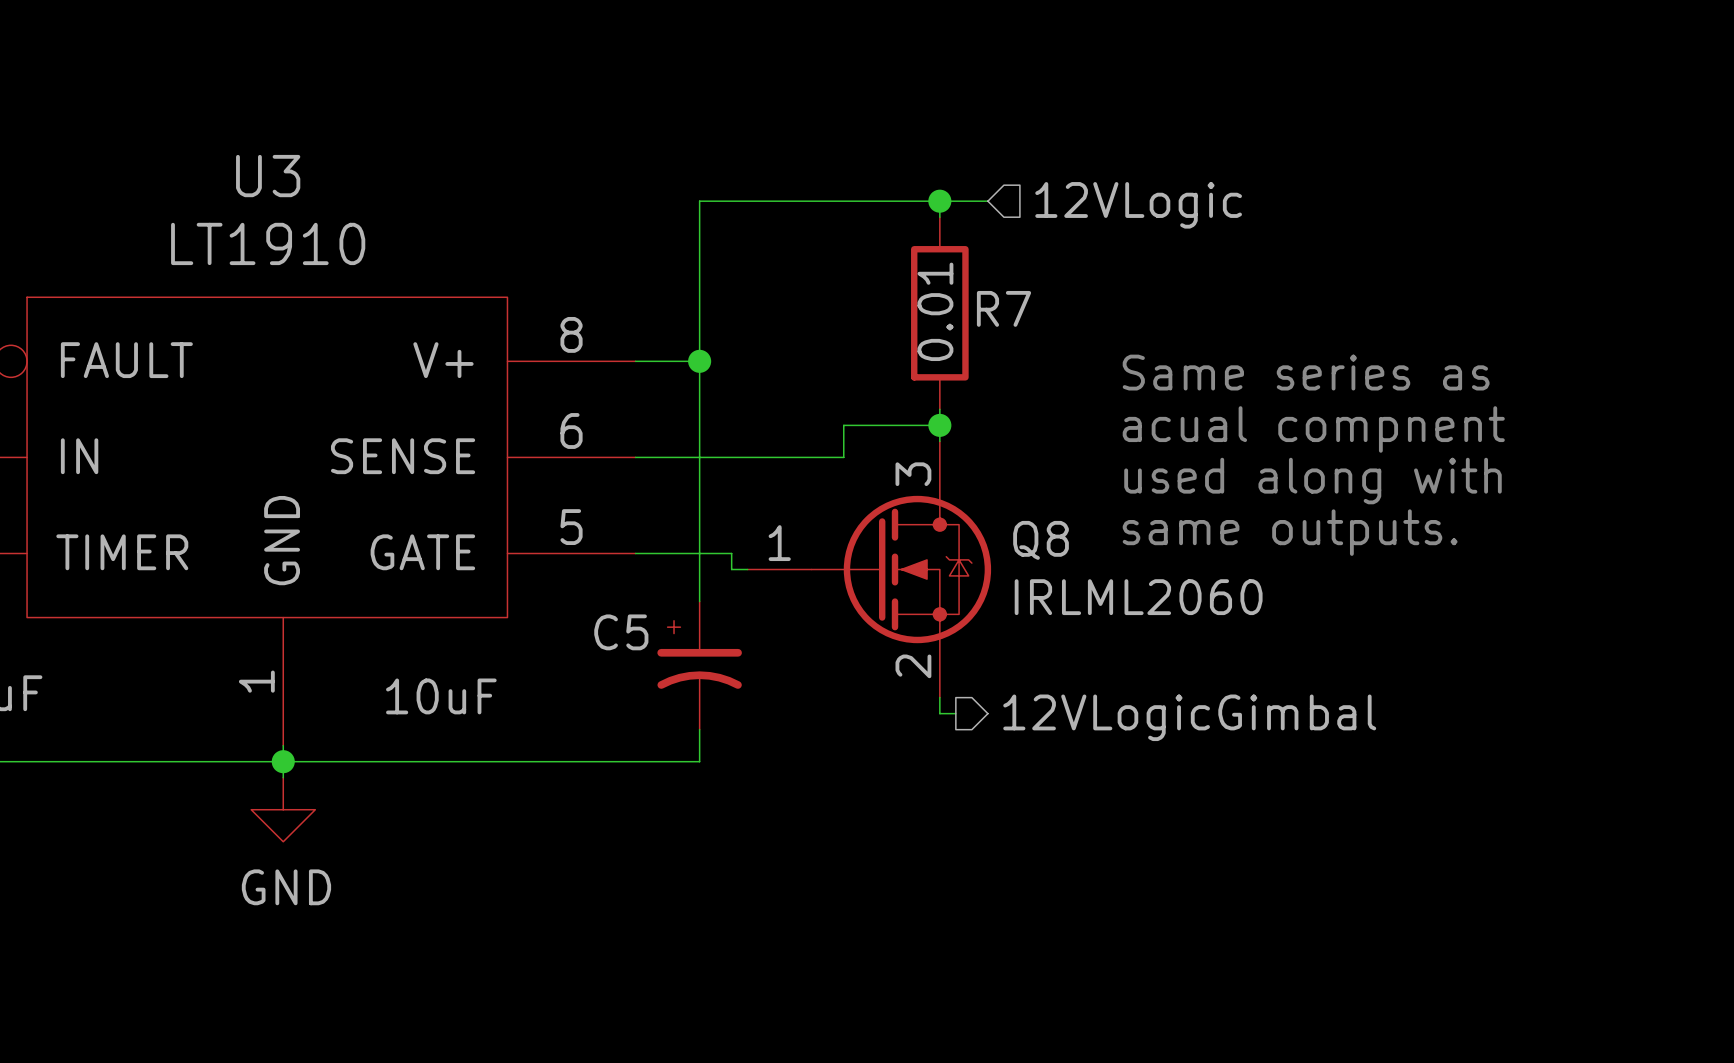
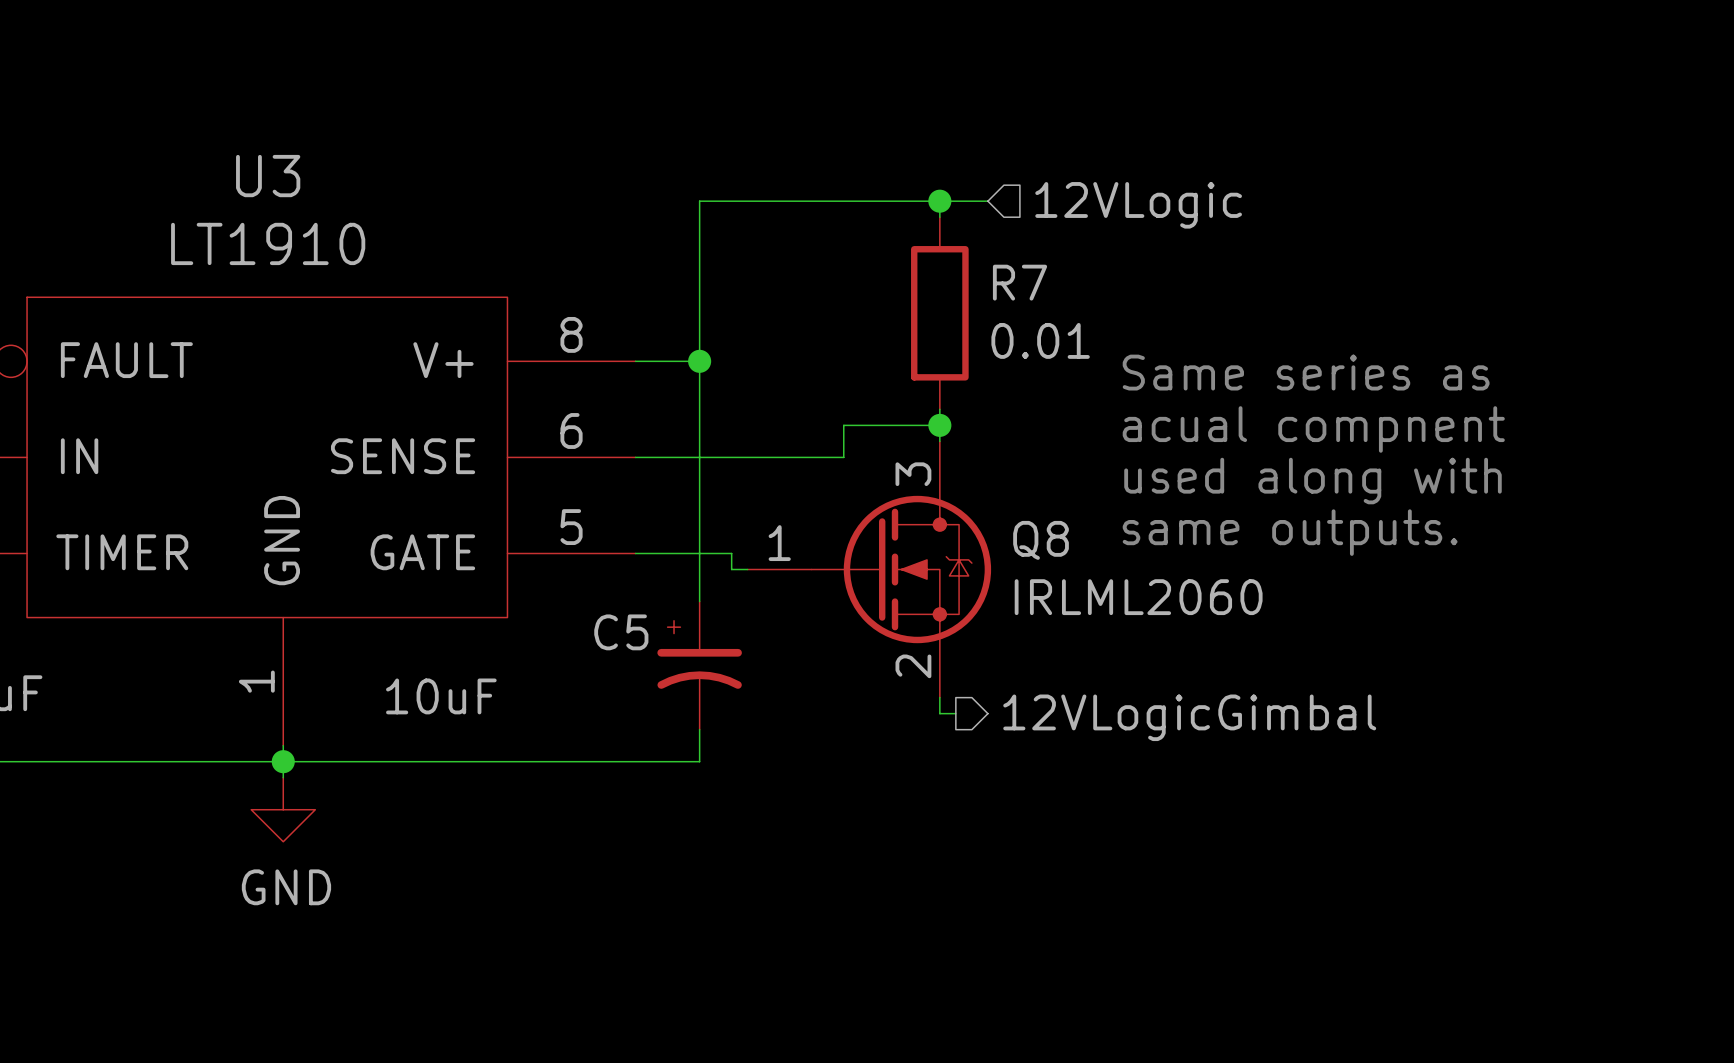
R7 name position: R7 (1003, 308) -> R7 (1020, 282)
R7 value rotation: 0° (935, 311) -> 90° clockwise (1040, 340)

